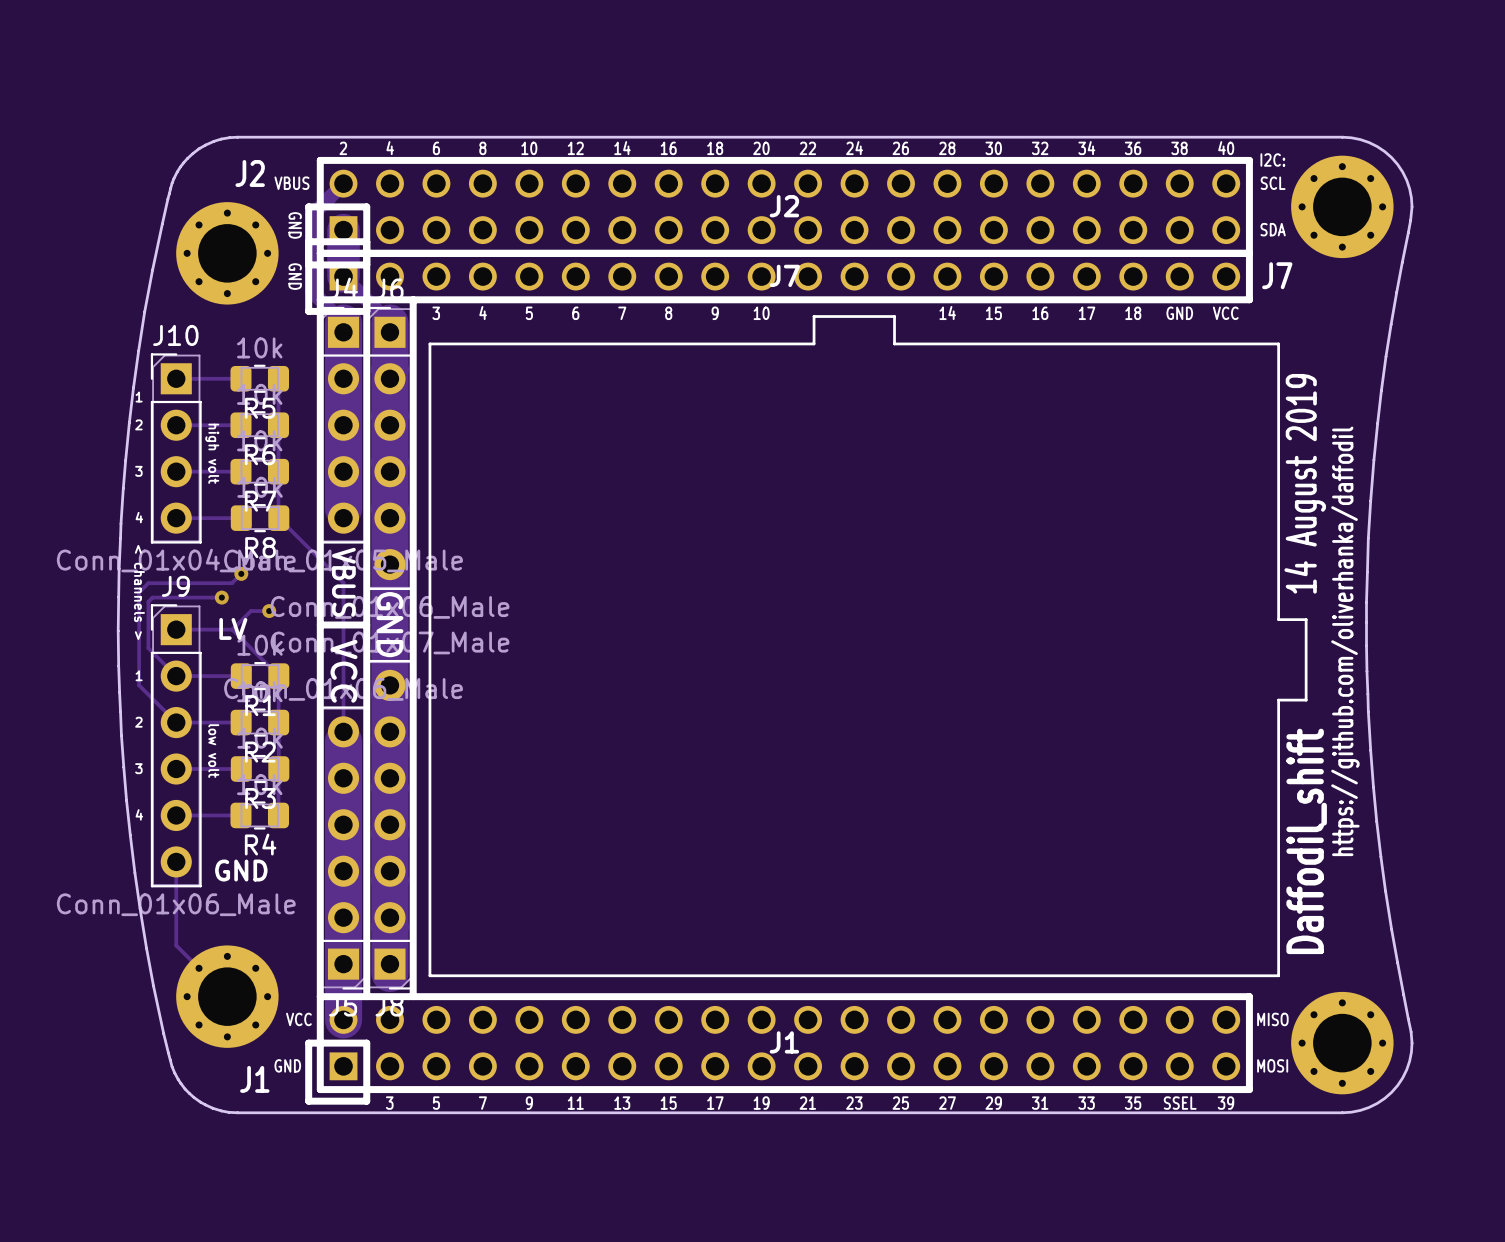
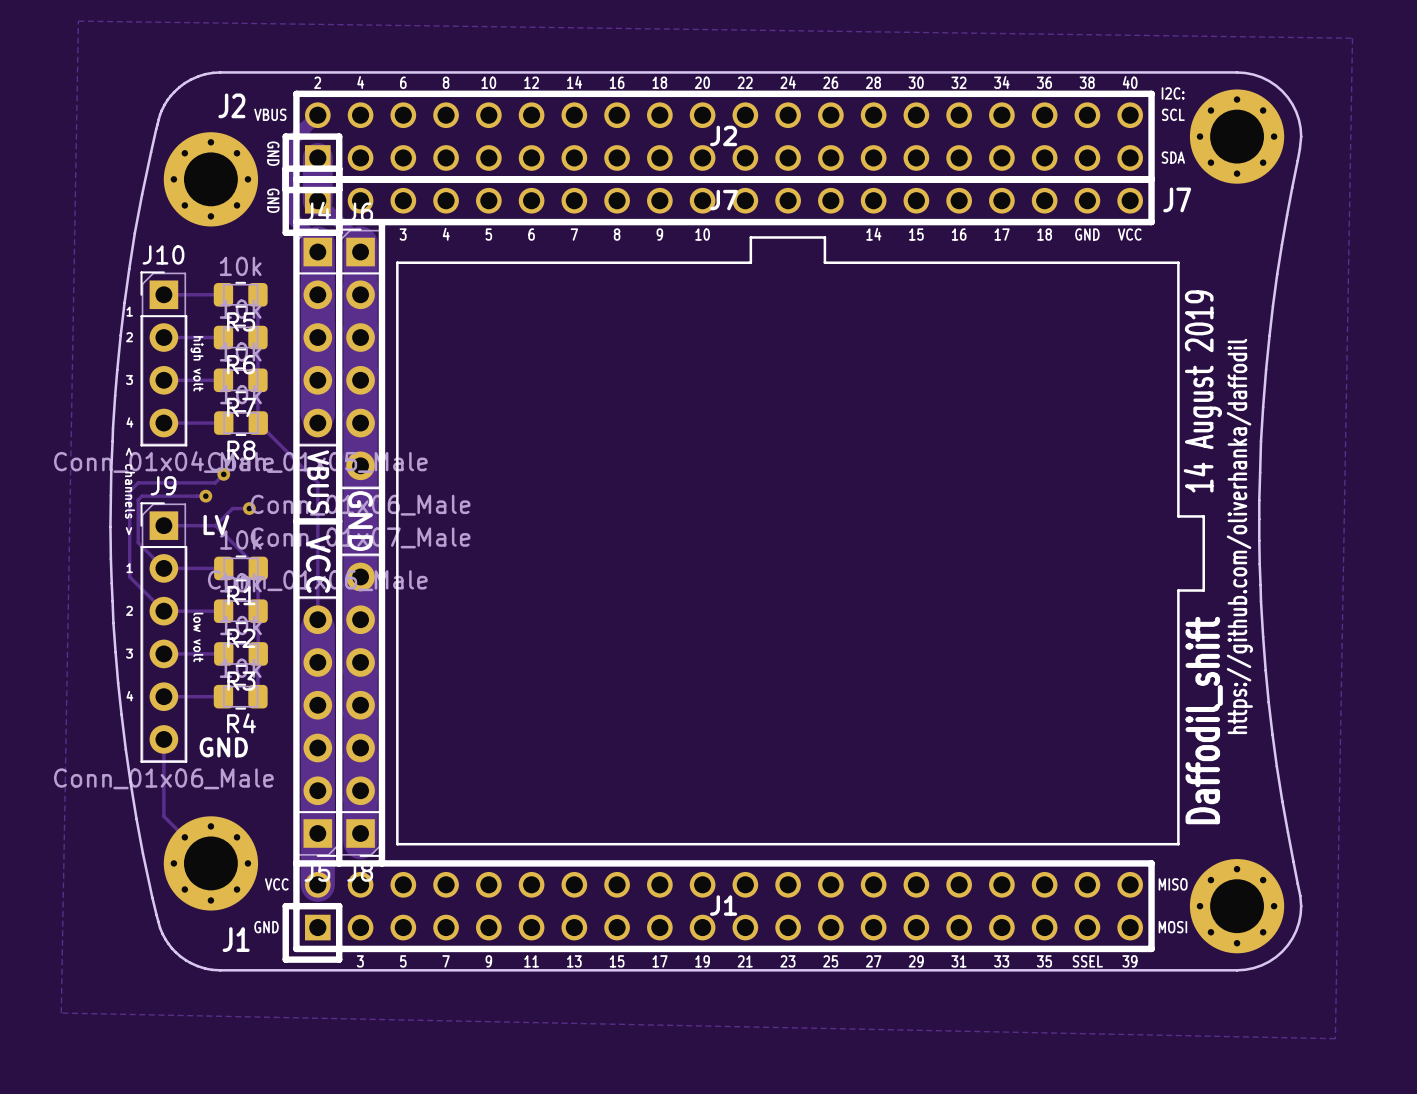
zone outline: none -> (78, 21) (1352, 38) (1335, 1038) (61, 1013) (78, 21)

